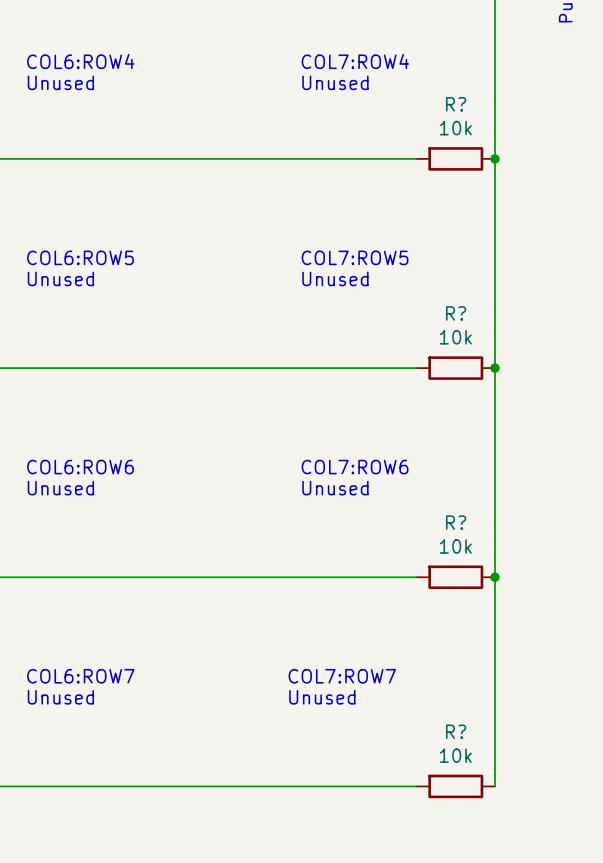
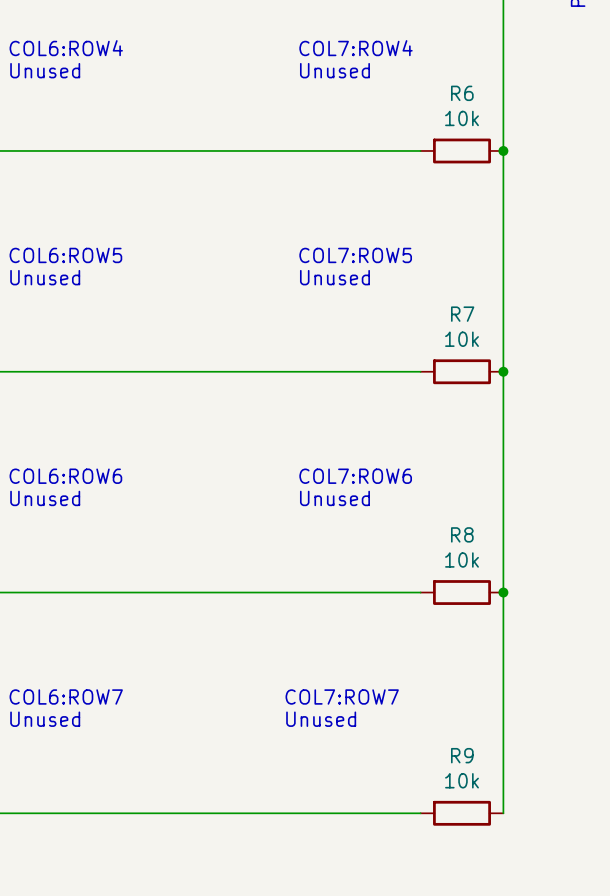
R? name: R? (456, 104) -> R6 (462, 93)
R? name: R? (456, 313) -> R7 (462, 314)
R? name: R? (456, 522) -> R8 (462, 534)
R? name: R? (456, 731) -> R9 (462, 755)

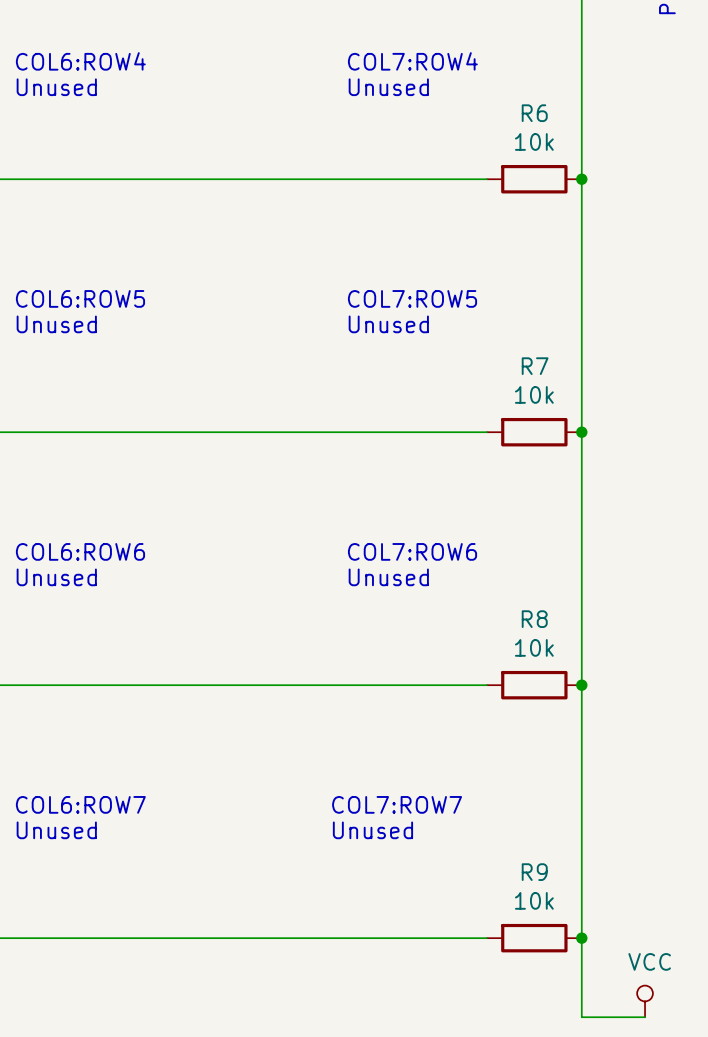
wire: none -> (581, 938) (581, 1017) (645, 1017)
junction: none -> (581, 938)
power symbol: none -> VCC (645, 1001)

